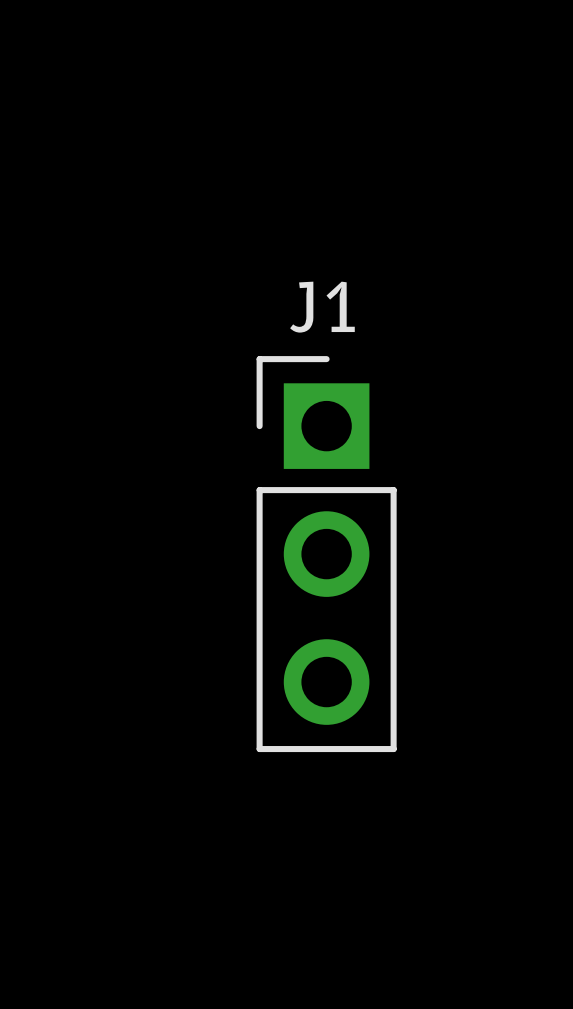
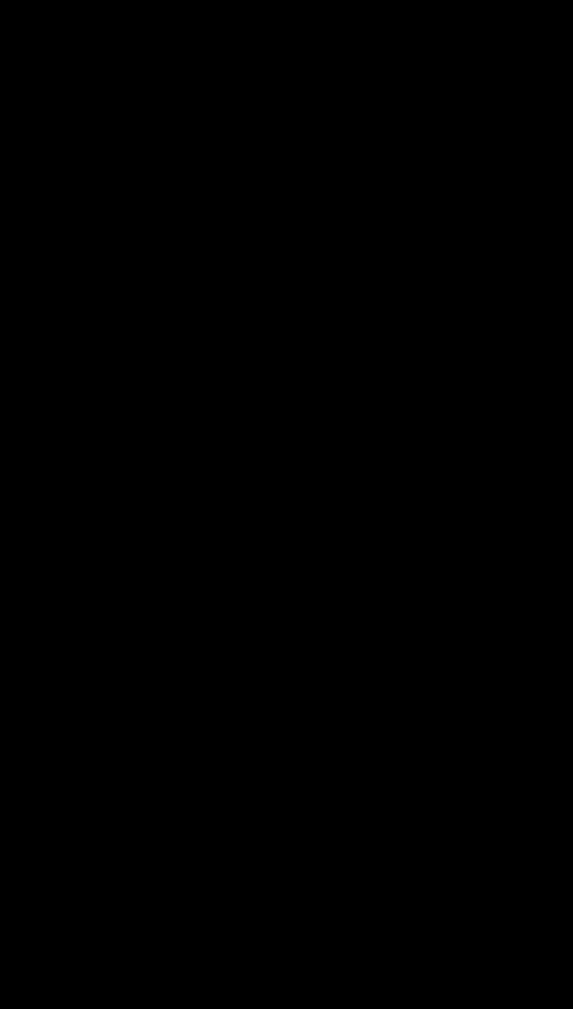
J1: (326, 554) -> none

